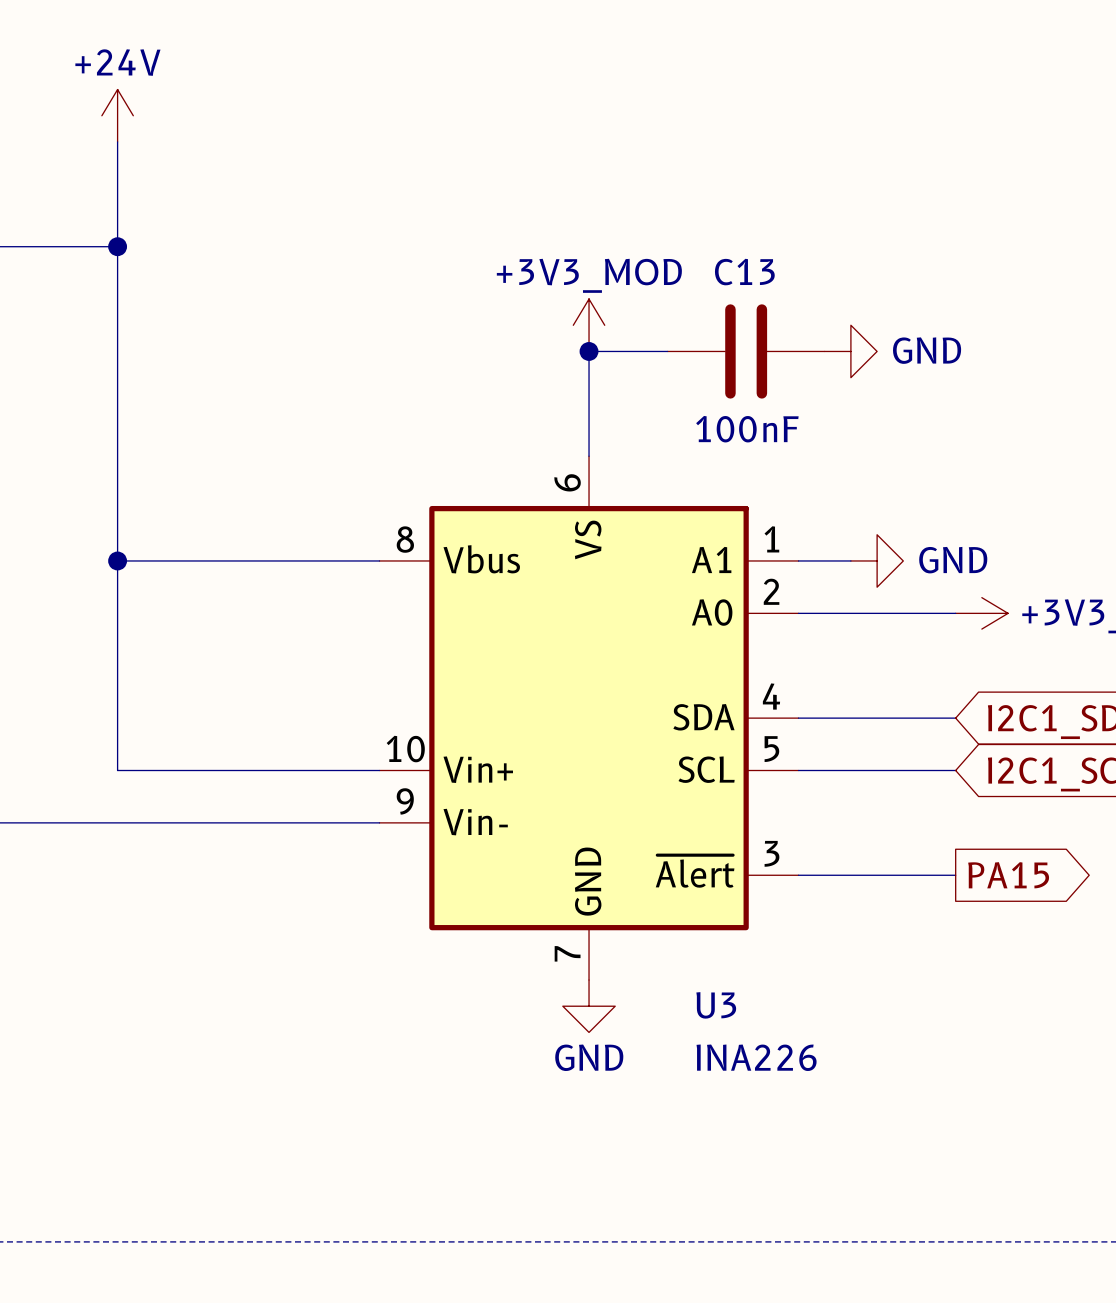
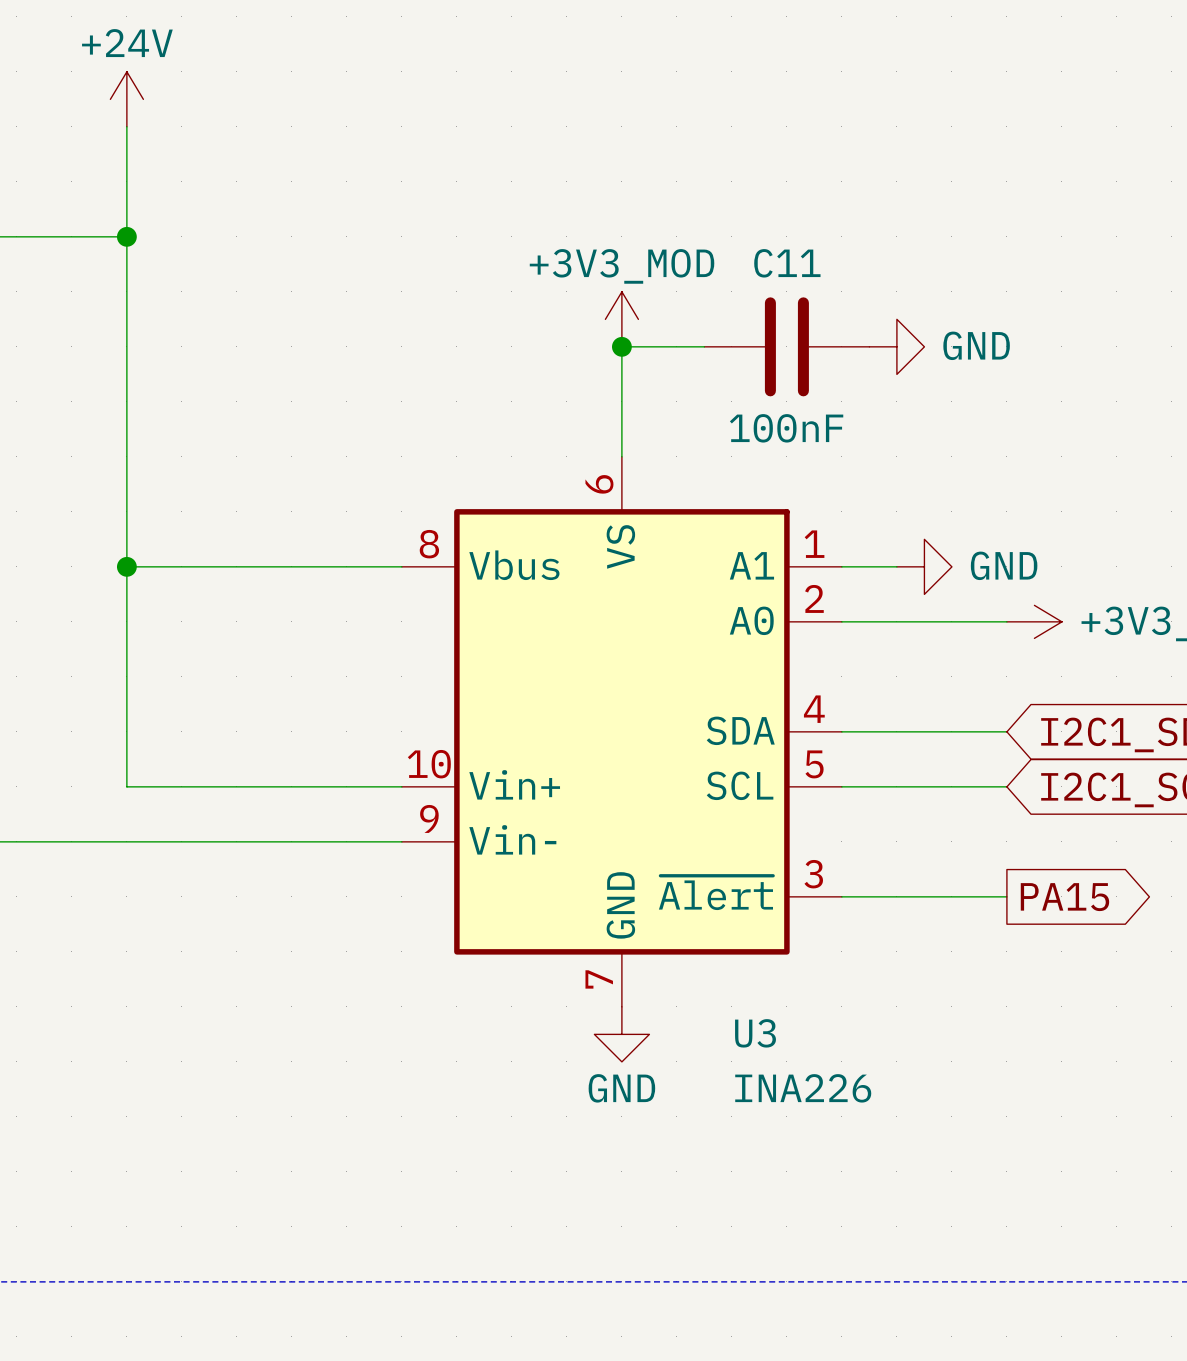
C13 name: C13 (744, 272) -> C11 (787, 263)

